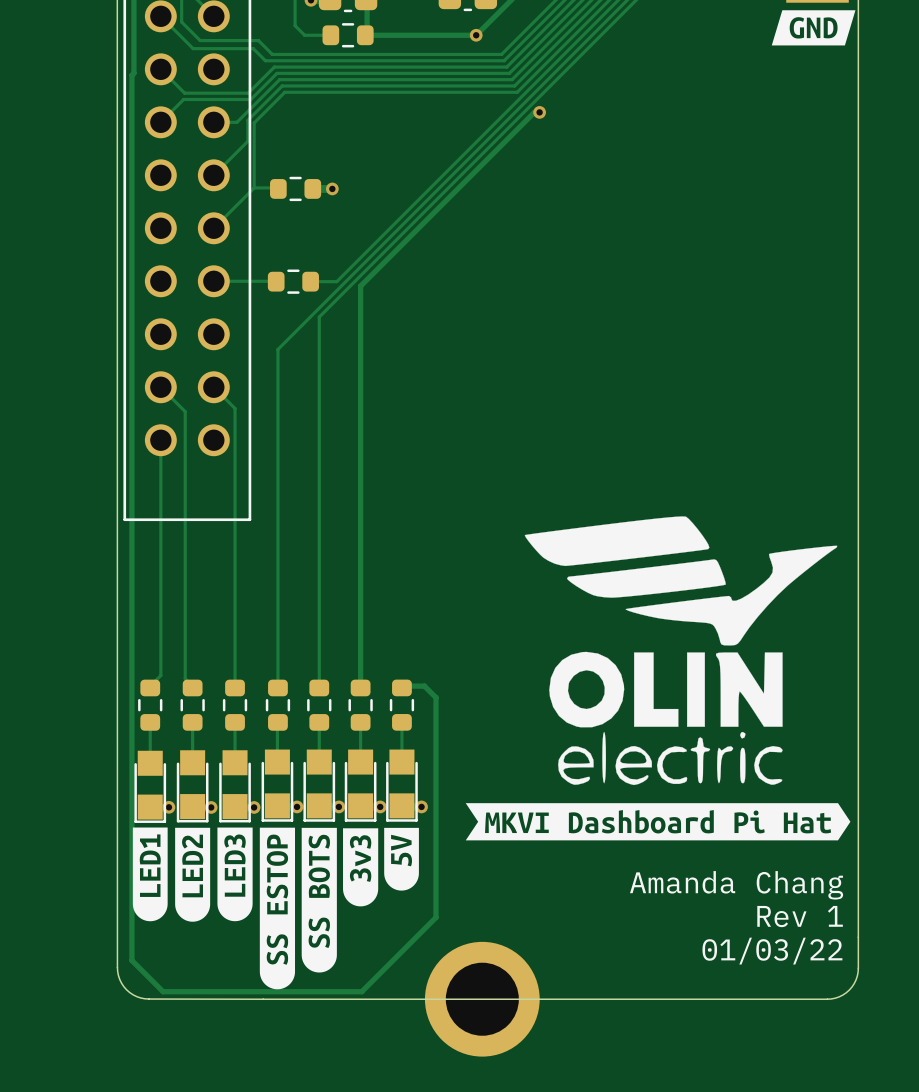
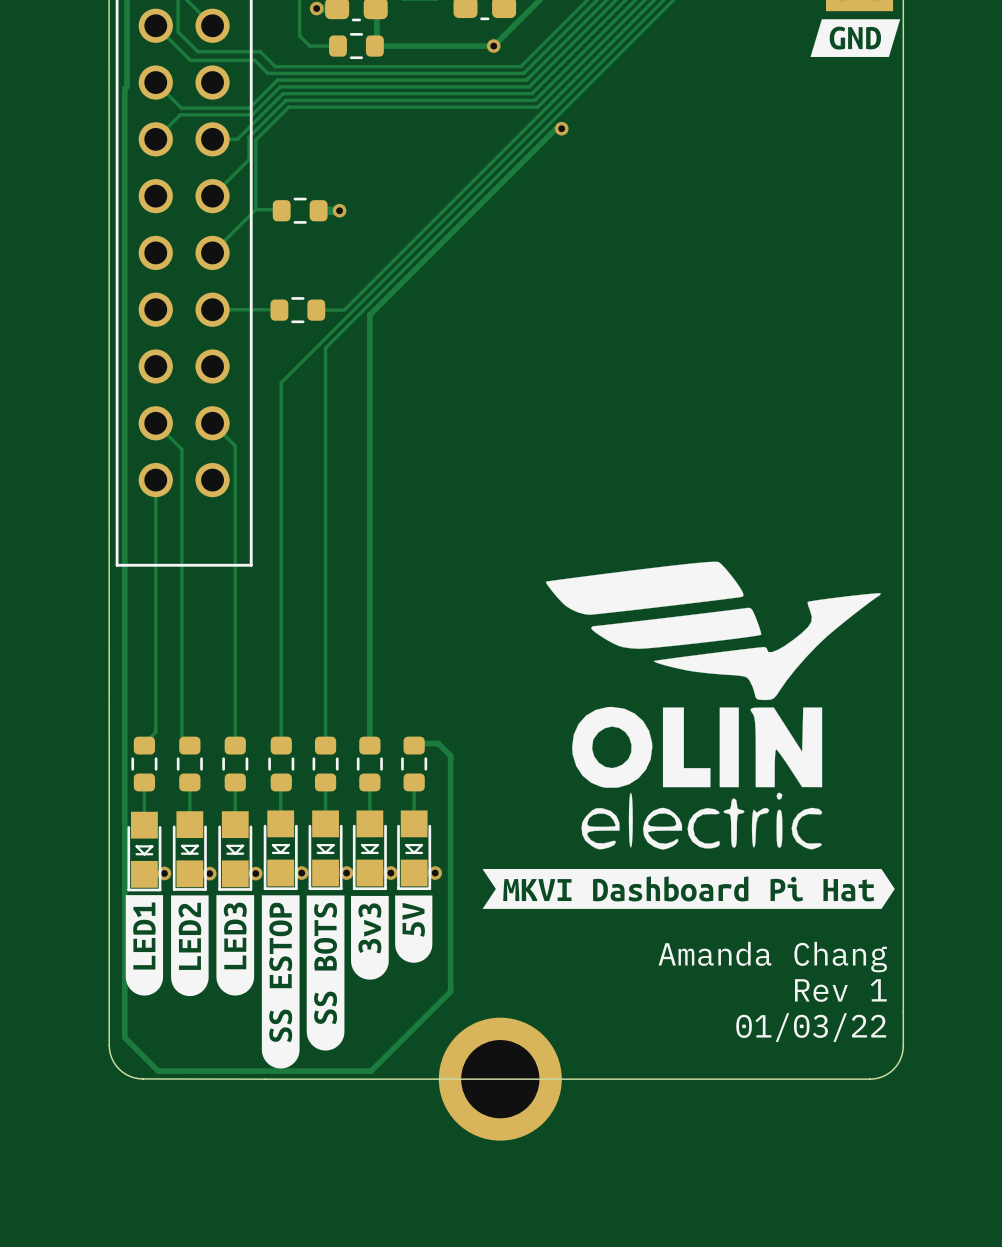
part footprint: [261, 749, 294, 822] -> [263, 810, 298, 891]
part footprint: [303, 749, 336, 822] -> [308, 810, 343, 891]
part footprint: [344, 749, 377, 822] -> [352, 810, 387, 891]
part footprint: [386, 749, 418, 822] -> [397, 810, 432, 891]
part footprint: [134, 750, 167, 823] -> [127, 811, 162, 892]
part footprint: [176, 750, 209, 823] -> [172, 811, 207, 891]
part footprint: [219, 750, 251, 823] -> [218, 811, 253, 891]

